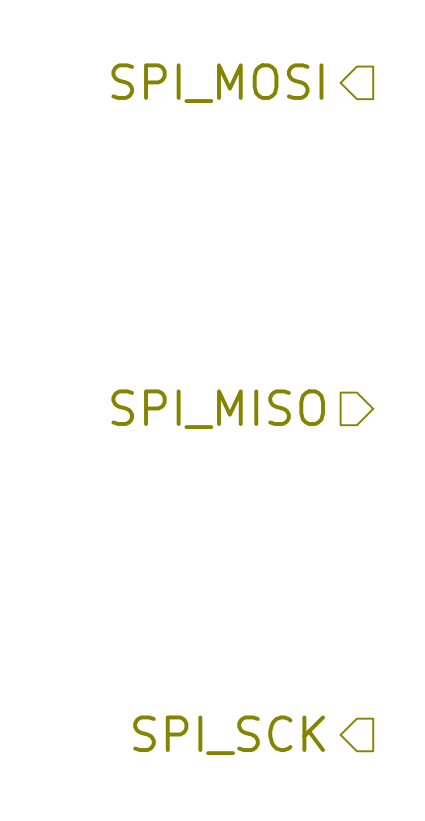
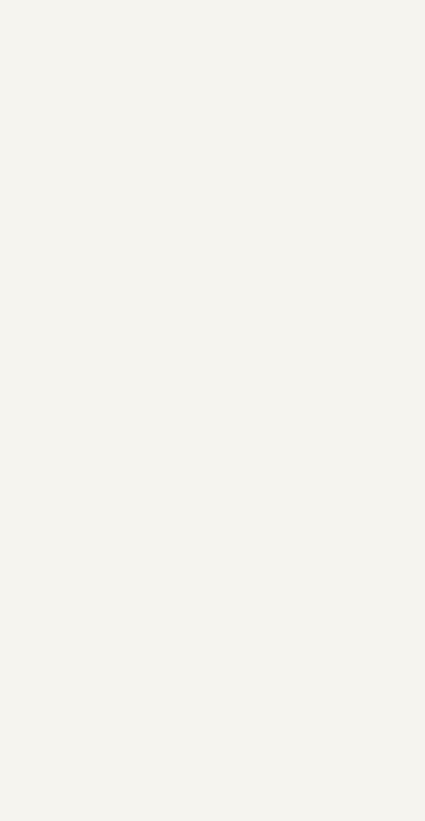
hierarchical label: SPI_MOSI (217, 83) -> none
hierarchical label: SPI_MISO (218, 409) -> none
hierarchical label: SPI_SCK (229, 735) -> none

